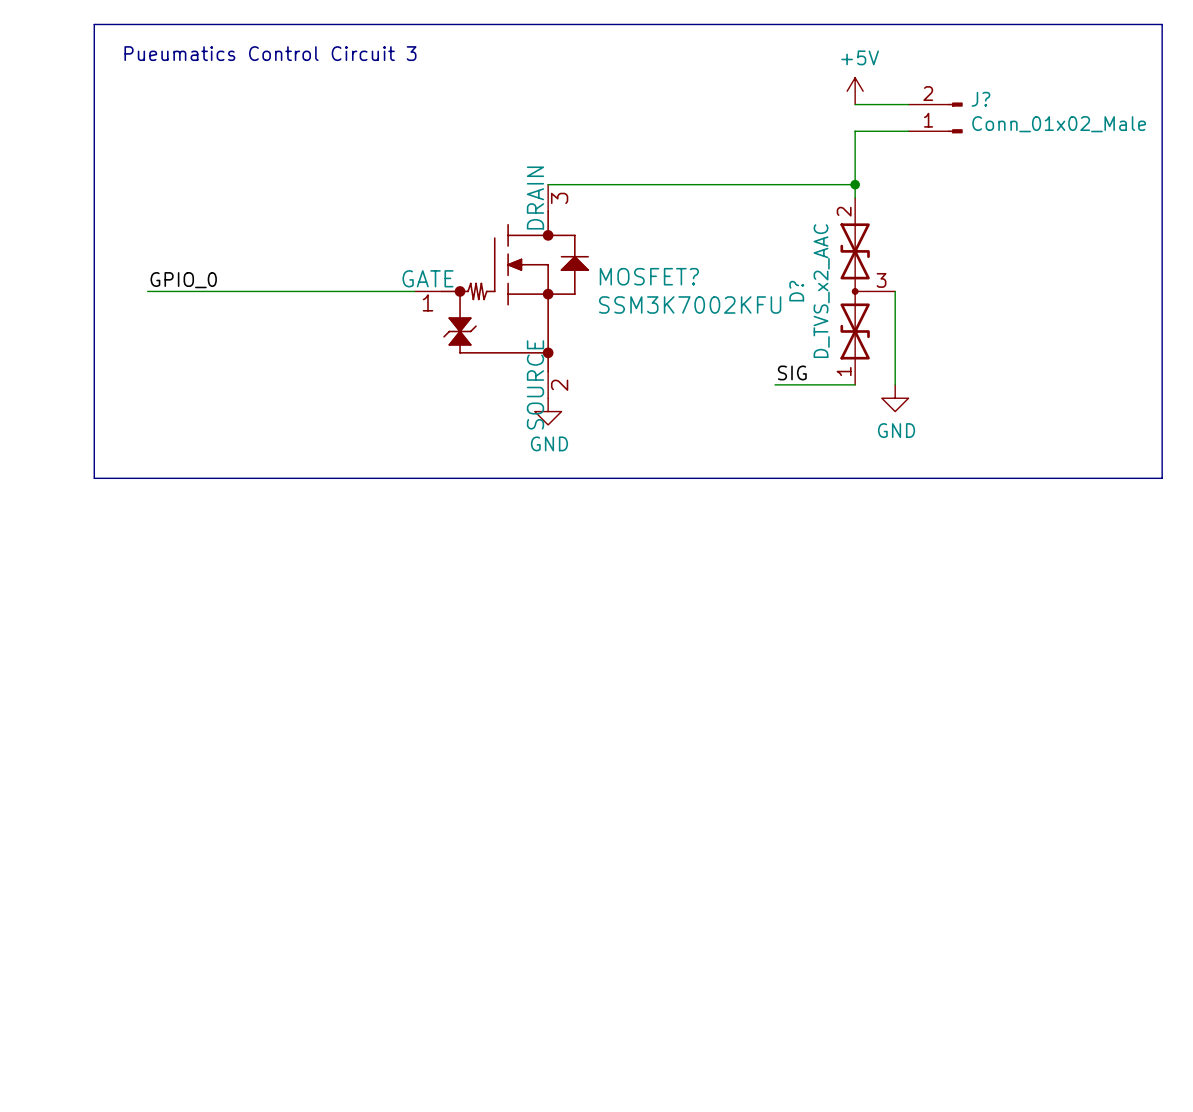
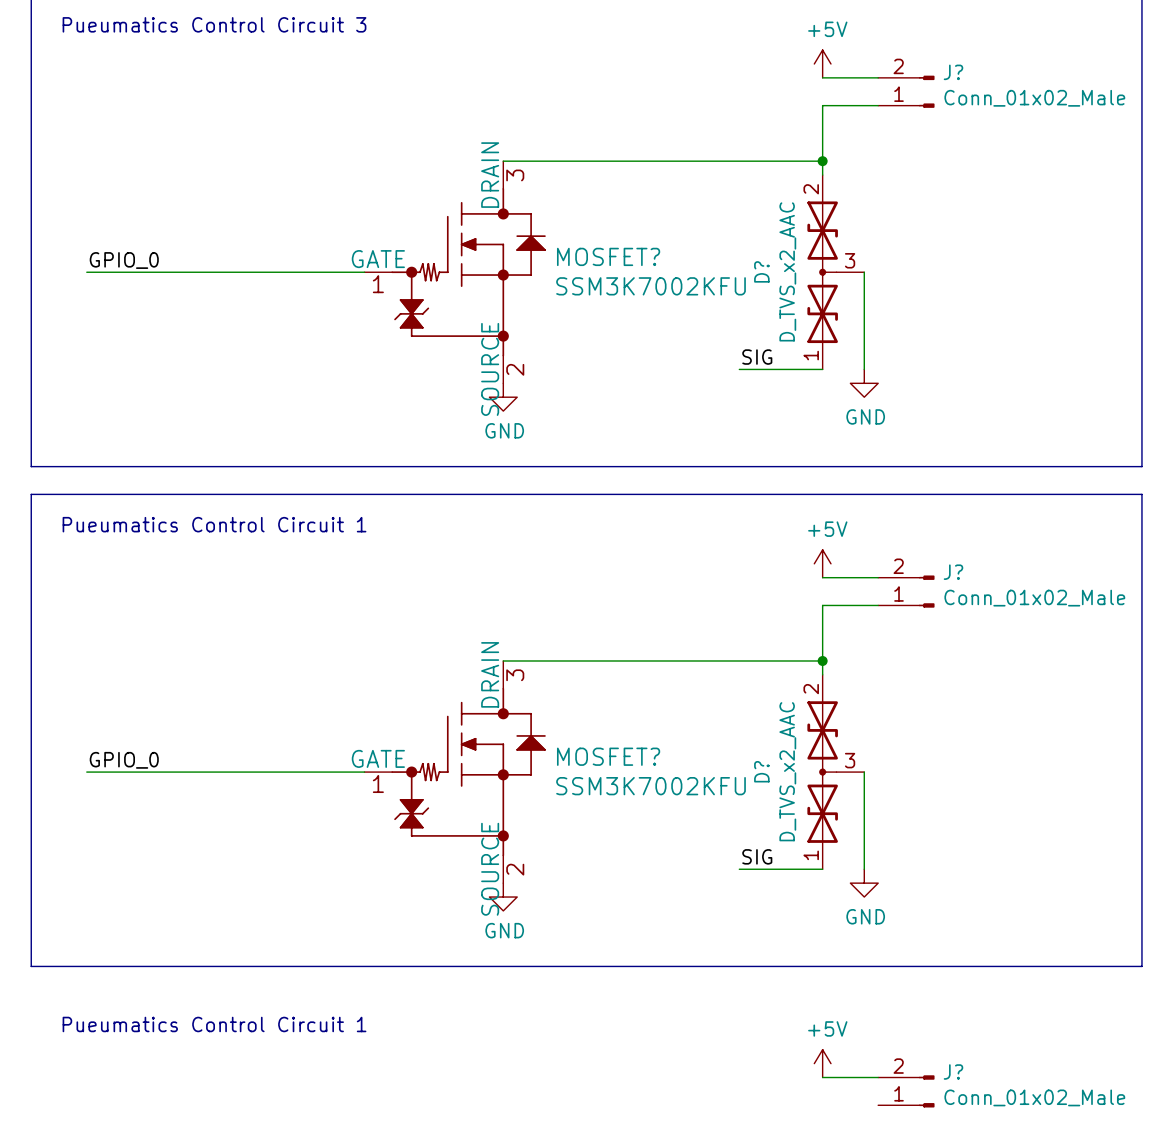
line: none -> (31, 494) (31, 966) (1141, 966) (1141, 494) (31, 494)
text: none -> Pueumatics Control Circuit 1 (214, 524)
power symbol: none -> +5V (822, 563)
wire: none -> (822, 577) (878, 577)
J?: none -> Conn_01x02_Male (906, 591)
wire: none -> (878, 605) (822, 605) (822, 674)
wire: none -> (503, 660) (822, 660)
junction: none -> (822, 660)
label: none -> GPIO_0 (124, 760)
wire: none -> (86, 772) (364, 772)
MOSFET?: none -> SSM3K7002KFU (455, 772)
D?: none -> D_TVS_x2_AAC (835, 772)
wire: none -> (864, 772) (864, 869)
label: none -> SIG (757, 856)
wire: none -> (739, 869) (822, 869)
power symbol: none -> GND (864, 883)
power symbol: none -> GND (503, 897)
text: none -> Pueumatics Control Circuit 1 (214, 1024)
power symbol: none -> +5V (822, 1063)
wire: none -> (822, 1077) (878, 1077)
J?: none -> Conn_01x02_Male (906, 1091)

